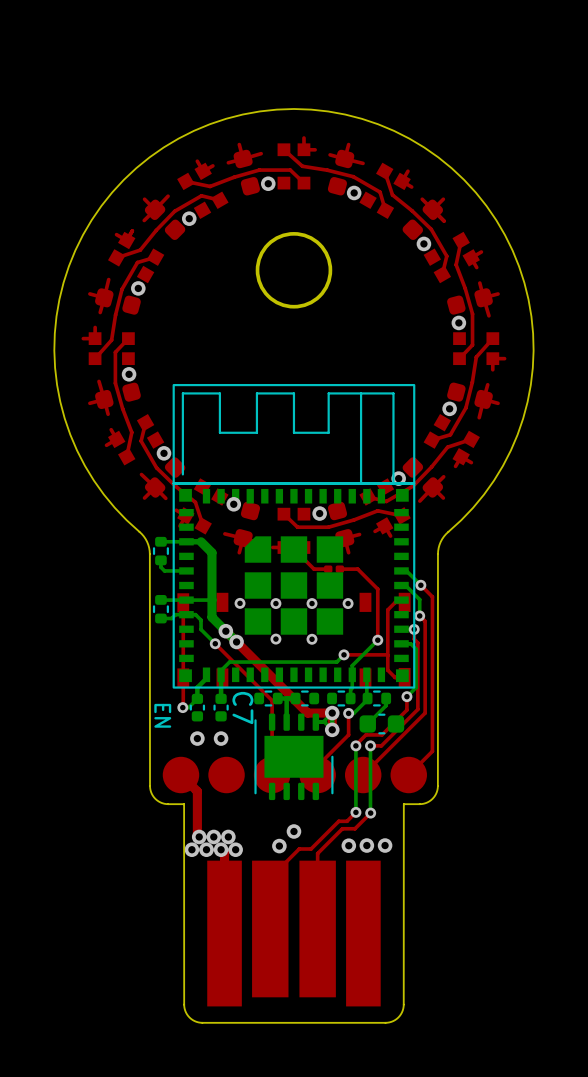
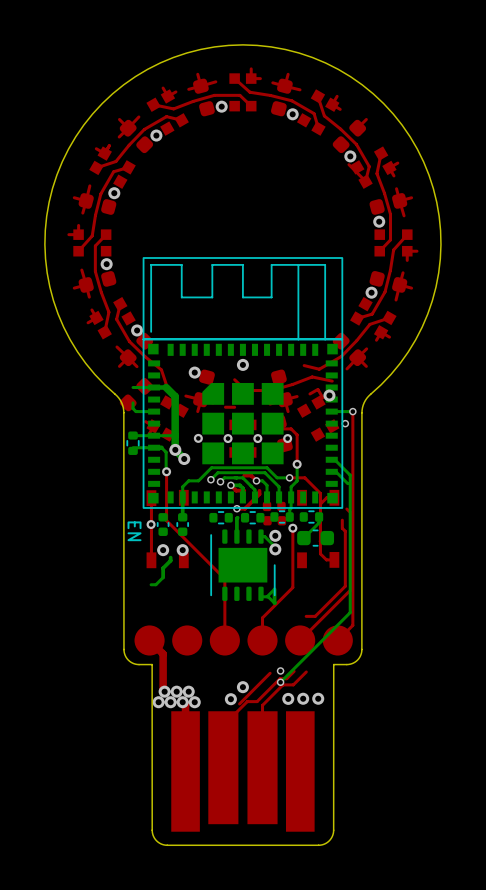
via: none -> (221, 106)
top track: (303, 138) (303, 149) -> (251, 68) (251, 78)
via: none -> (292, 114)
top track: (239, 144) (243, 158) -> (197, 74) (200, 86)
top track: (348, 144) (344, 158) -> (288, 74) (284, 86)
top track: (283, 149) (302, 166) (353, 176) (380, 192) (385, 210) -> (234, 78) (249, 92) (291, 100) (314, 113) (318, 128)
top track: (303, 149) (315, 149) -> (251, 78) (260, 78)
top track: (261, 153) (243, 158) -> (215, 81) (200, 86)
top track: (330, 154) (344, 158) -> (272, 82) (284, 86)
top track: (243, 158) (228, 162) -> (200, 86) (188, 89)
top track: (344, 158) (363, 163) -> (284, 86) (300, 89)
top track: (197, 161) (202, 170) -> (163, 88) (167, 96)
via: none -> (156, 135)
top track: (212, 165) (203, 171) -> (175, 91) (167, 96)
part position: (293, 166) -> (242, 92)
top track: (384, 171) (392, 194) (431, 229) (446, 256) (442, 274) -> (317, 96) (324, 115) (356, 144) (369, 166) (365, 181)
top track: (407, 171) (402, 180) -> (337, 96) (332, 104)
part position: (246, 172) -> (203, 97)
part position: (341, 172) -> (281, 97)
top track: (185, 181) (210, 186) (259, 170) (290, 170) (303, 183) -> (153, 104) (173, 108) (214, 95) (239, 95) (251, 106)
top track: (402, 181) (411, 187) -> (332, 104) (340, 109)
via: (268, 183) -> none
via: none -> (350, 156)
part position: (202, 190) -> (167, 112)
part position: (385, 190) -> (318, 112)
via: (354, 192) -> none
top track: (168, 196) (155, 209) -> (138, 116) (128, 128)
top track: (144, 199) (155, 209) -> (119, 119) (128, 128)
top track: (443, 199) (432, 209) -> (366, 119) (357, 128)
top track: (219, 200) (201, 195) (174, 211) (140, 250) (116, 257) -> (181, 120) (166, 116) (144, 129) (115, 161) (96, 167)
top track: (155, 209) (144, 220) -> (128, 128) (119, 137)
via: (189, 218) -> none
part position: (165, 219) -> (136, 136)
part position: (422, 219) -> (349, 136)
top track: (132, 230) (126, 240) -> (109, 145) (104, 153)
round board edge: [255, 232, 333, 309] -> none
via: none -> (114, 193)
top track: (116, 234) (126, 240) -> (96, 148) (104, 153)
top track: (461, 240) (456, 264) (472, 314) (472, 344) (459, 358) -> (381, 153) (376, 173) (390, 214) (390, 239) (379, 251)
via: (423, 243) -> none
part: none -> (97, 203)
part: none -> (388, 203)
top track: (481, 251) (471, 257) -> (397, 163) (389, 167)
part position: (136, 257) -> (112, 167)
top track: (155, 257) (137, 262) (122, 289) (111, 340) (95, 358) -> (128, 167) (113, 171) (100, 193) (92, 235) (78, 251)
part position: (451, 257) -> (373, 167)
top track: (471, 257) (476, 267) -> (389, 167) (393, 175)
via: none -> (379, 221)
top track: (108, 279) (104, 297) -> (89, 185) (86, 200)
top track: (479, 283) (483, 297) -> (396, 188) (399, 200)
part footprint: [95, 288, 141, 315] -> [73, 229, 112, 257]
via: (138, 288) -> none
part footprint: [447, 288, 493, 315] -> [374, 229, 413, 257]
top track: (89, 293) (104, 297) -> (74, 197) (86, 200)
top track: (498, 293) (483, 297) -> (411, 197) (399, 200)
top track: (104, 297) (100, 312) -> (86, 200) (82, 213)
top track: (483, 297) (488, 315) -> (399, 200) (404, 215)
via: none -> (106, 264)
via: (458, 322) -> none
top track: (95, 327) (95, 338) -> (78, 225) (78, 234)
part footprint: [88, 332, 135, 366] -> [78, 271, 117, 293]
part footprint: [453, 332, 500, 366] -> [369, 270, 408, 293]
top track: (94, 338) (83, 338) -> (78, 234) (68, 234)
top track: (128, 338) (115, 352) (115, 383) (131, 432) (126, 456) -> (106, 234) (95, 245) (95, 271) (108, 312) (104, 332)
top track: (492, 338) (476, 357) (465, 407) (450, 434) (432, 440) -> (407, 234) (393, 249) (385, 291) (372, 314) (357, 318)
via: none -> (371, 292)
top track: (492, 358) (492, 369) -> (407, 251) (407, 260)
top track: (504, 358) (493, 358) -> (417, 251) (407, 251)
via: (129, 374) -> none
top track: (98, 381) (104, 399) -> (81, 270) (86, 284)
top track: (487, 384) (483, 399) -> (403, 272) (399, 284)
part: (117, 395) -> none
part: (469, 395) -> none
top track: (104, 399) (108, 414) -> (86, 284) (89, 297)
top track: (104, 399) (89, 403) -> (86, 284) (74, 288)
via: none -> (137, 330)
top track: (483, 399) (498, 403) -> (399, 284) (411, 288)
top track: (483, 399) (479, 417) -> (399, 284) (396, 300)
via: (449, 408) -> none
top track: (145, 422) (141, 441) (156, 467) (195, 502) (203, 525) -> (120, 304) (116, 319) (129, 341) (161, 369) (167, 389)
part: none -> (136, 349)
top track: (111, 429) (116, 439) -> (91, 309) (96, 317)
top track: (116, 439) (106, 445) -> (96, 318) (88, 322)
part position: (136, 439) -> (112, 318)
part position: (451, 439) -> (373, 318)
top track: (471, 439) (447, 447) (413, 485) (386, 501) (368, 497) -> (389, 317) (369, 324) (341, 356) (319, 369) (304, 365)
via: none -> (242, 364)
via: none -> (194, 372)
via: (164, 453) -> none
top track: (461, 456) (455, 466) -> (381, 332) (376, 340)
top track: (461, 457) (471, 462) -> (381, 332) (389, 337)
bottom track: none -> (133, 387) (166, 387) (175, 396) (175, 449) (184, 459)
part: none -> (281, 388)
top track: (141, 474) (155, 487) -> (116, 346) (128, 357)
top track: (443, 476) (432, 487) -> (366, 348) (357, 357)
part position: (422, 477) -> (349, 349)
top track: (155, 487) (165, 498) -> (128, 357) (137, 366)
top track: (155, 487) (144, 498) -> (128, 357) (119, 366)
top track: (432, 487) (443, 498) -> (357, 357) (366, 366)
top track: (432, 487) (419, 501) -> (357, 357) (346, 368)
bottom track: none -> (352, 411) (331, 411)
via: none -> (352, 411)
via: (233, 504) -> none
via: none -> (345, 423)
via: (319, 513) -> none
top track: (283, 514) (297, 527) (328, 527) (377, 510) (402, 515) -> (234, 379) (245, 390) (271, 390) (312, 376) (332, 381)
top track: none -> (280, 428) (291, 428) (297, 434) (297, 464)
part position: (246, 524) -> (203, 388)
top track: (384, 525) (375, 531) -> (317, 389) (309, 393)
top track: (385, 526) (390, 536) -> (318, 389) (322, 397)
via: none -> (198, 438)
via: none -> (228, 438)
via: none -> (257, 438)
via: none -> (287, 438)
top track: (224, 533) (243, 538) -> (185, 396) (200, 399)
top track: (359, 534) (344, 538) -> (297, 396) (284, 399)
part position: (293, 536) -> (242, 382)
top track: (243, 538) (239, 552) -> (200, 399) (197, 411)
top track: (344, 538) (348, 552) -> (284, 399) (288, 411)
bottom track: (195, 541) (201, 541) (211, 552) (211, 617) (236, 641) -> (161, 447) (166, 452) (166, 471)
via: none -> (175, 449)
top track: (272, 547) (283, 547) -> (225, 407) (234, 407)
top track: (303, 547) (303, 559) (314, 569) (328, 569) -> none
part position: (160, 551) -> (133, 443)
board edge: (437, 554) (439, 544) (444, 536) (473, 507) (502, 465) (523, 418) (530, 385) (533, 350) (528, 299) (512, 250) (486, 206) (464, 179) (424, 147) (378, 124) (328, 111) (276, 109) (242, 114) (193, 130) (149, 157) (123, 179) (101, 205) (75, 250) (59, 299) (54, 350) (60, 401) (77, 450) (103, 494) (143, 536) (149, 547) (150, 785) -> (361, 457) (361, 412) (364, 402) (399, 363) (415, 339) (427, 314) (438, 273) (440, 244) (436, 202) (428, 175) (417, 149) (393, 113) (362, 84) (325, 63) (299, 53) (257, 45) (214, 46) (186, 52) (147, 69) (112, 93) (92, 113) (75, 136) (56, 174) (49, 202) (45, 230) (45, 258) (49, 286) (63, 327) (85, 363) (118, 398) (123, 407) (123, 649)
via: none -> (184, 459)
bottom track: none -> (331, 459) (334, 459) (350, 475) (350, 612) (280, 682)
bottom track: (160, 560) (160, 567) (164, 570) (186, 570) -> (133, 402) (133, 408) (136, 411) (154, 411)
bottom track: none -> (297, 464) (297, 480) (291, 486) (289, 517)
via: none -> (297, 464)
part: (334, 569) -> none
top track: (339, 569) (357, 569) (377, 589) (377, 640) -> none
top track: none -> (166, 471) (166, 520) (177, 531)
via: none -> (166, 471)
top track: none -> (244, 475) (251, 475) (256, 480)
top track: none -> (289, 477) (304, 477) (320, 493) (320, 504)
bottom track: none -> (289, 477) (277, 477) (266, 467) (211, 467) (198, 480) (188, 480) (182, 486) (182, 517)
via: none -> (289, 477)
bottom track: none -> (210, 479) (217, 472) (264, 472) (279, 486) (279, 497)
via: none -> (210, 479)
bottom track: none -> (256, 480) (262, 480) (267, 485) (267, 497)
via: none -> (256, 480)
bottom track: none -> (220, 481) (224, 477) (242, 477) (254, 490) (254, 497)
via: none -> (220, 481)
bottom track: (401, 585) (405, 585) (419, 599) (419, 615) -> none
top track: (420, 585) (432, 596) (432, 751) (426, 756) -> (352, 411) (352, 625)
via: (420, 585) -> none
top track: none -> (230, 485) (236, 490) (244, 490)
bottom track: none -> (230, 485) (239, 485) (242, 488) (242, 497)
via: none -> (230, 485)
top track: none -> (259, 490) (259, 494) (244, 508) (236, 508)
bottom track: (211, 600) (161, 600) -> (175, 435) (133, 435)
via: (240, 603) -> none
via: (275, 603) -> none
via: (312, 603) -> none
via: (348, 603) -> none
part: (160, 609) -> none
part: none -> (274, 506)
via: none -> (236, 508)
via: (419, 615) -> none
bottom track: (160, 618) (171, 618) (175, 614) (195, 614) (201, 620) (201, 629) (215, 643) -> none
part: none -> (282, 517)
part: none -> (311, 517)
part: none -> (221, 517)
bottom track: none -> (237, 517) (236, 536)
part: none -> (252, 517)
via: (414, 629) -> none
part: none -> (274, 520)
top track: (225, 631) (307, 713) (332, 713) (332, 729) -> none
via: (225, 631) -> none
via: none -> (151, 524)
part: none -> (163, 524)
part: none -> (182, 524)
via: (275, 639) -> none
via: (312, 639) -> none
via: none -> (292, 528)
bottom track: (377, 640) (352, 665) (350, 698) -> none
via: (377, 640) -> none
via: (236, 641) -> none
via: (215, 643) -> none
bottom track: (401, 643) (410, 643) (416, 649) (416, 687) (406, 696) -> none
via: none -> (275, 535)
bottom track: none -> (261, 536) (264, 536) (275, 547)
bottom track: (344, 654) (336, 662) (229, 662) (221, 670) (221, 698) -> none
via: (344, 654) -> none
top track: (387, 654) (344, 654) -> none
via: none -> (275, 549)
via: none -> (163, 550)
via: none -> (182, 550)
bottom track: (366, 674) (367, 699) (353, 713) (348, 713) -> none
top track: (183, 677) (182, 707) -> none
top track: (406, 696) (406, 710) (382, 734) (365, 734) (355, 745) -> none
via: (406, 696) -> none
part: (268, 698) -> none
bottom track: (286, 698) (286, 722) -> none
part: (304, 698) -> none
part: (341, 698) -> none
part: (376, 698) -> none
bottom track: (386, 698) (386, 705) (367, 723) -> (319, 517) (319, 522) (303, 538)
via: (182, 707) -> none
part: (197, 707) -> none
C7: (221, 707) -> none
via: (332, 713) -> none
top track: (348, 713) (348, 734) (317, 765) -> (292, 528) (292, 587) (262, 617) (262, 632)
via: (348, 713) -> none
text position: EN (162, 715) -> EN (134, 531)
part position: (381, 723) -> (315, 538)
via: (332, 729) -> none
via: (197, 738) -> none
via: (221, 738) -> none
bottom track: (355, 745) (355, 812) -> none
via: (355, 745) -> none
bottom track: (370, 745) (370, 812) -> none
via: (370, 745) -> none
part position: (293, 756) -> (242, 565)
via: none -> (280, 670)
via: (355, 812) -> none
via: (370, 813) -> none
top track: none -> (270, 673) (239, 703)
via: none -> (280, 682)

